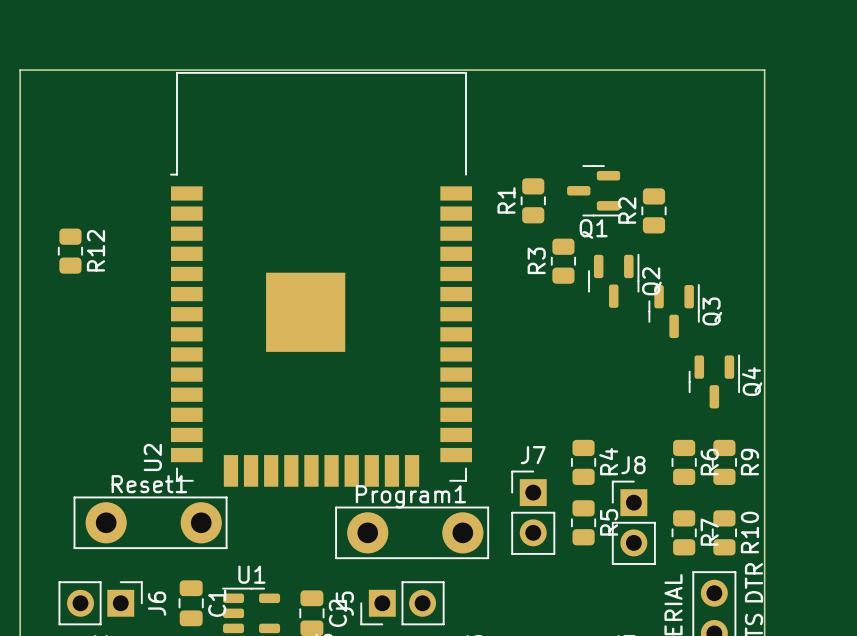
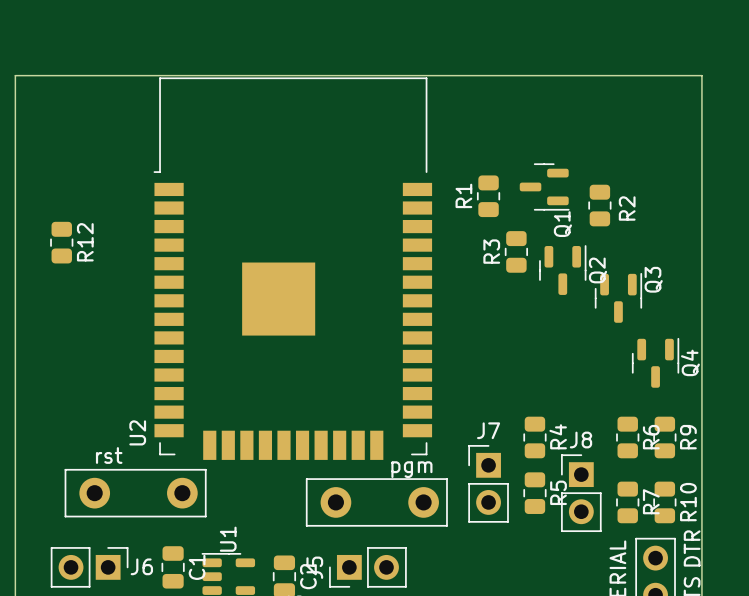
R2 name position: R2 (627, 210) -> R2 (627, 208)
Q1 name rotation: 0° (593, 228) -> 90° counterclockwise (562, 224)
Q3 name position: Q3 (712, 311) -> Q3 (653, 279)
Reset1: (150, 522) -> none
rst: none -> (135, 493)
Program1: (412, 532) -> none
pgm: none -> (376, 502)
U1 name rotation: 0° (251, 574) -> 90° counterclockwise (228, 539)
J6 name rotation: 0° (157, 603) -> 90° clockwise (141, 566)

